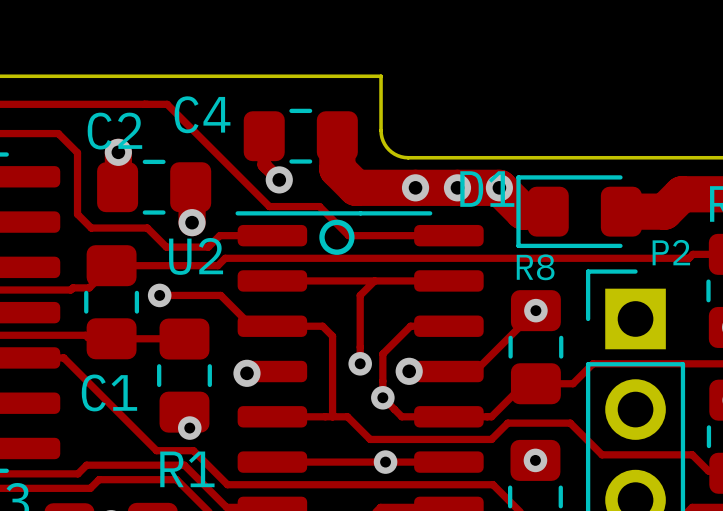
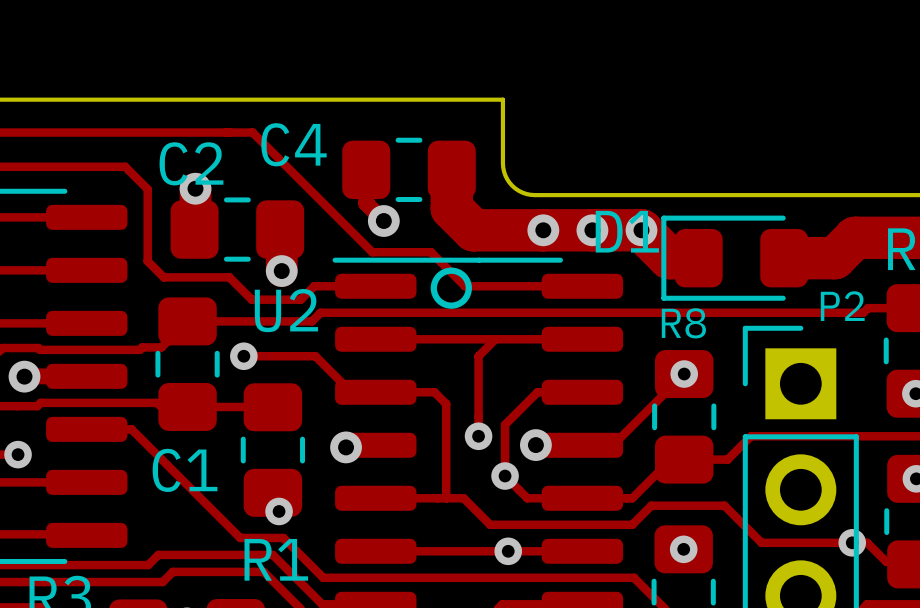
via: none -> (852, 542)

